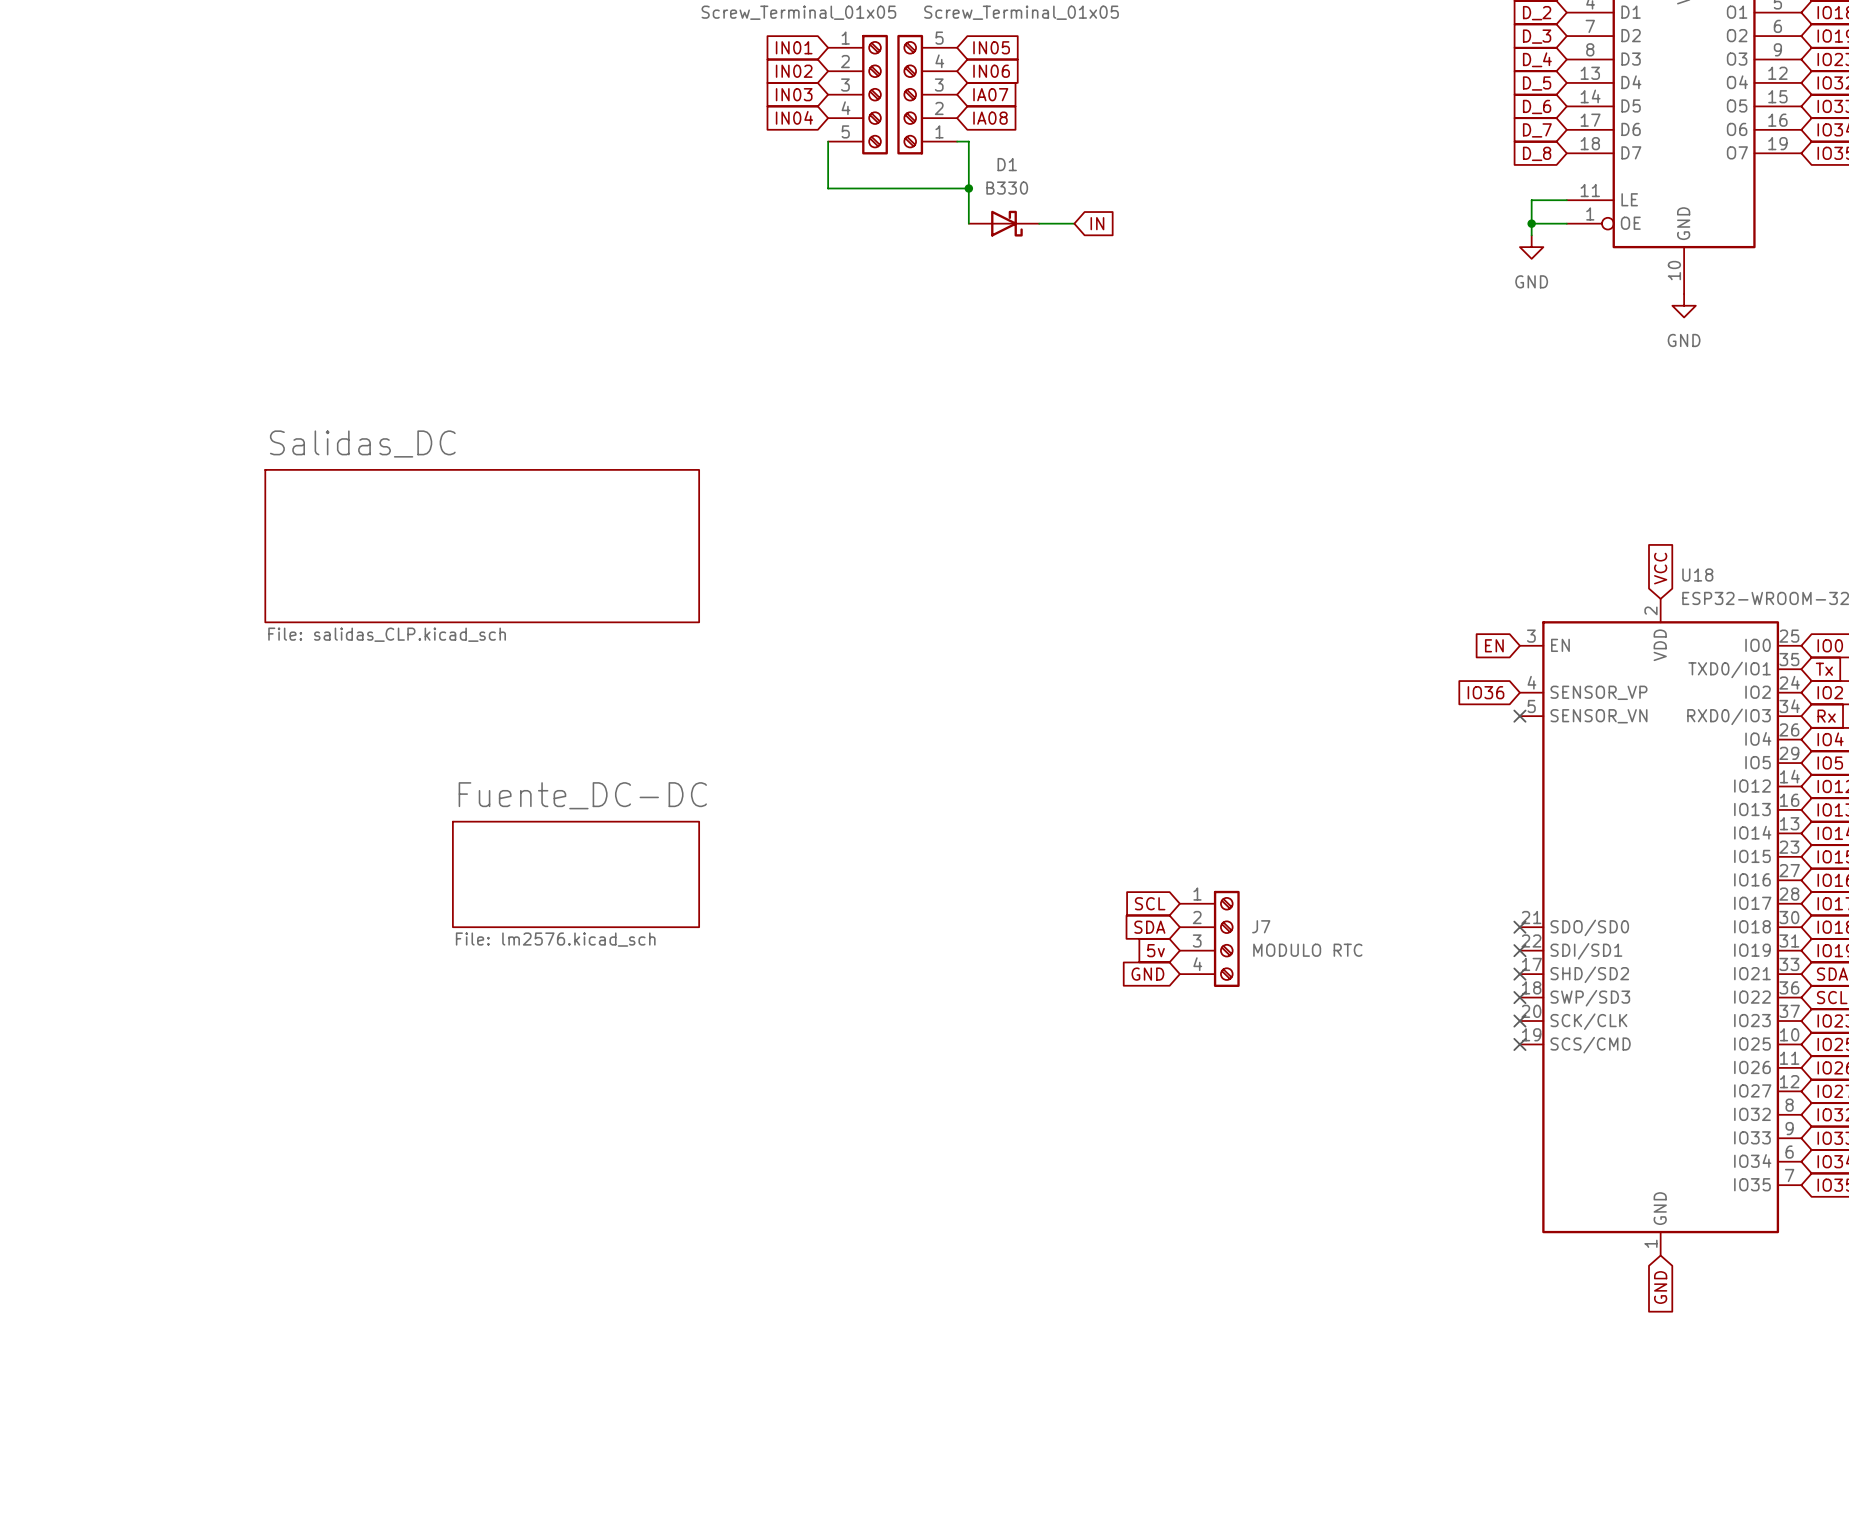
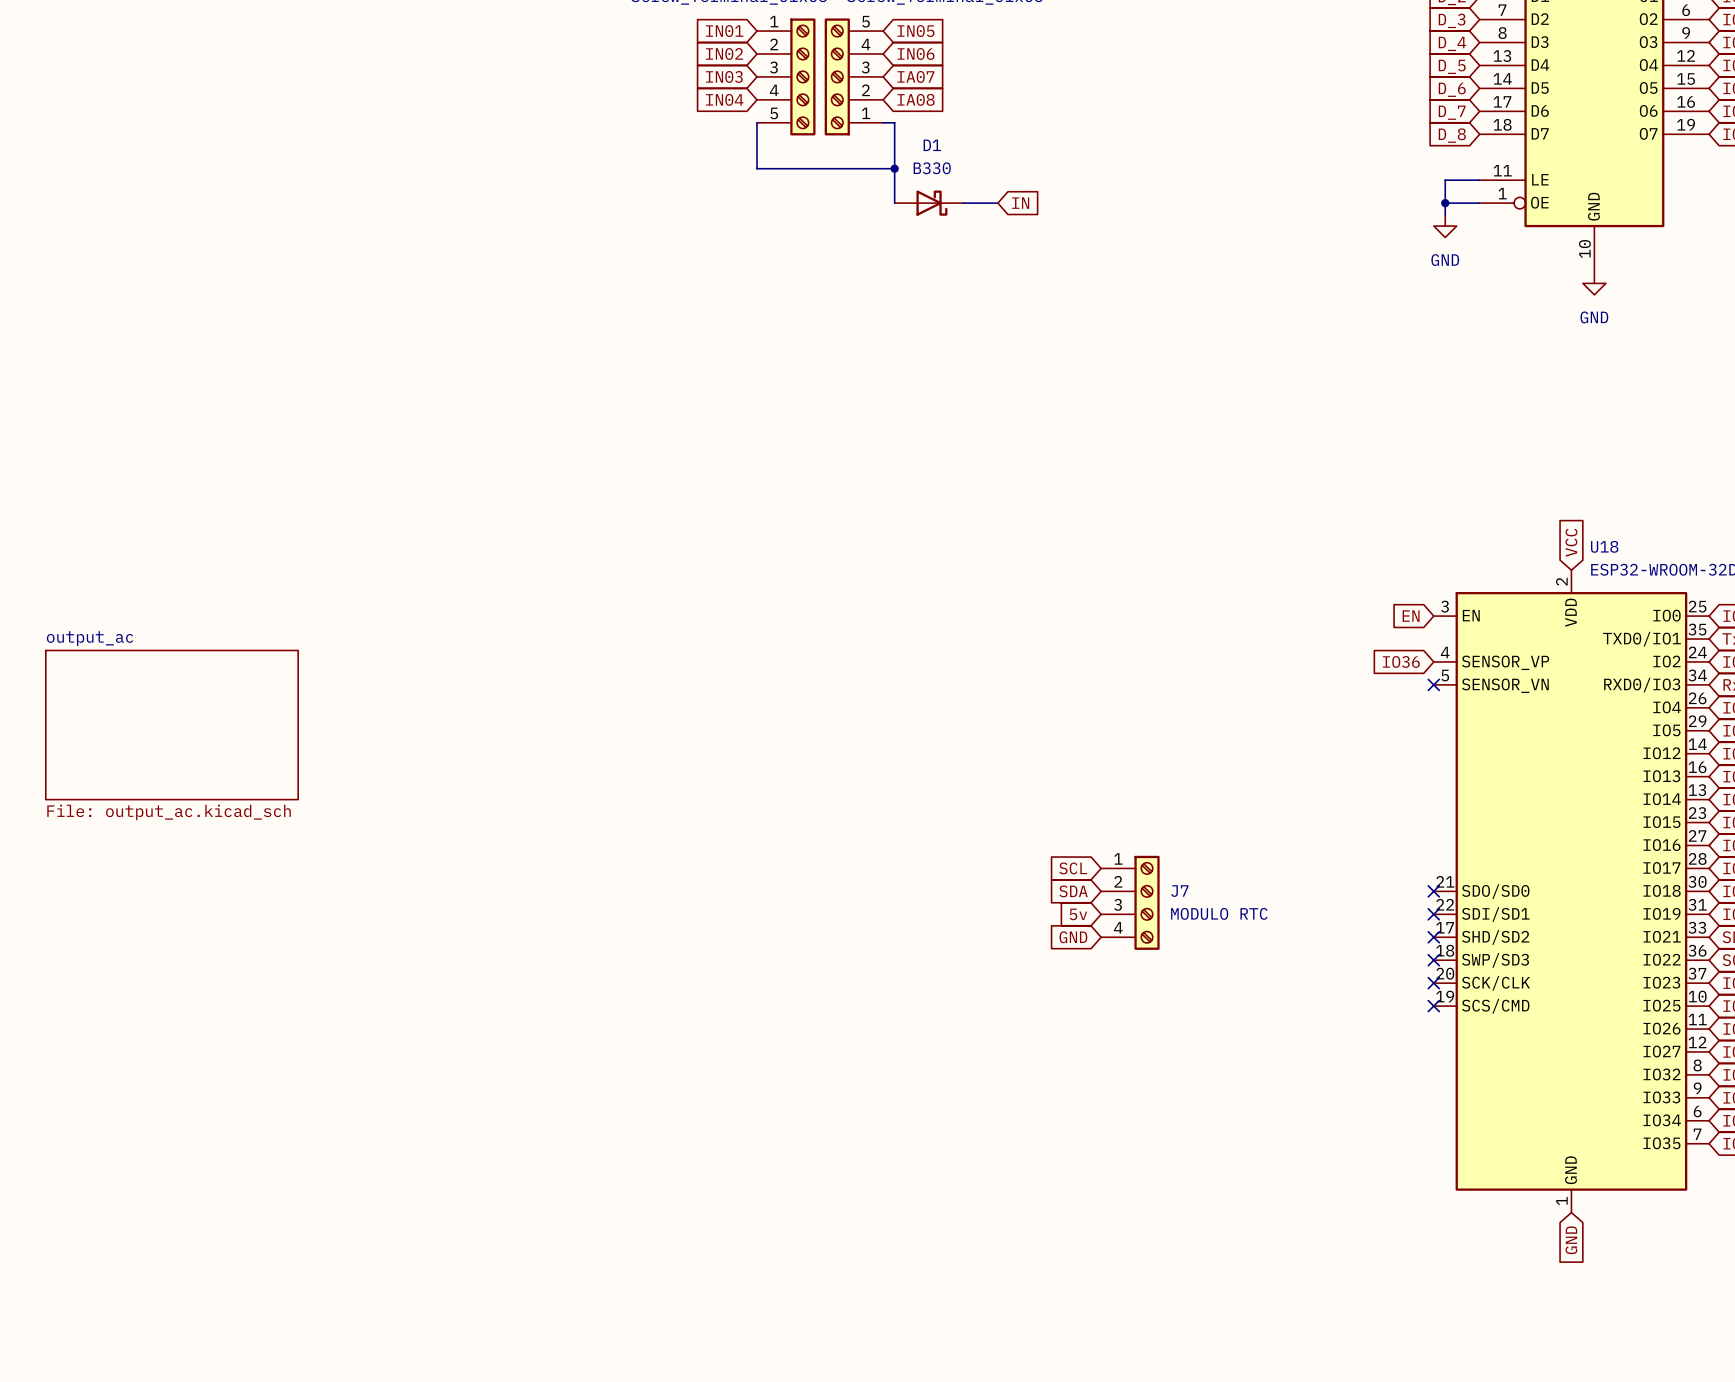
sheet Salidas_DC: File: salidas_CLP.kicad_sch (482, 546) -> none
sheet output_ac: none -> File: output_ac.kicad_sch (171, 725)
sheet Fuente_DC-DC: File: lm2576.kicad_sch (576, 874) -> none

